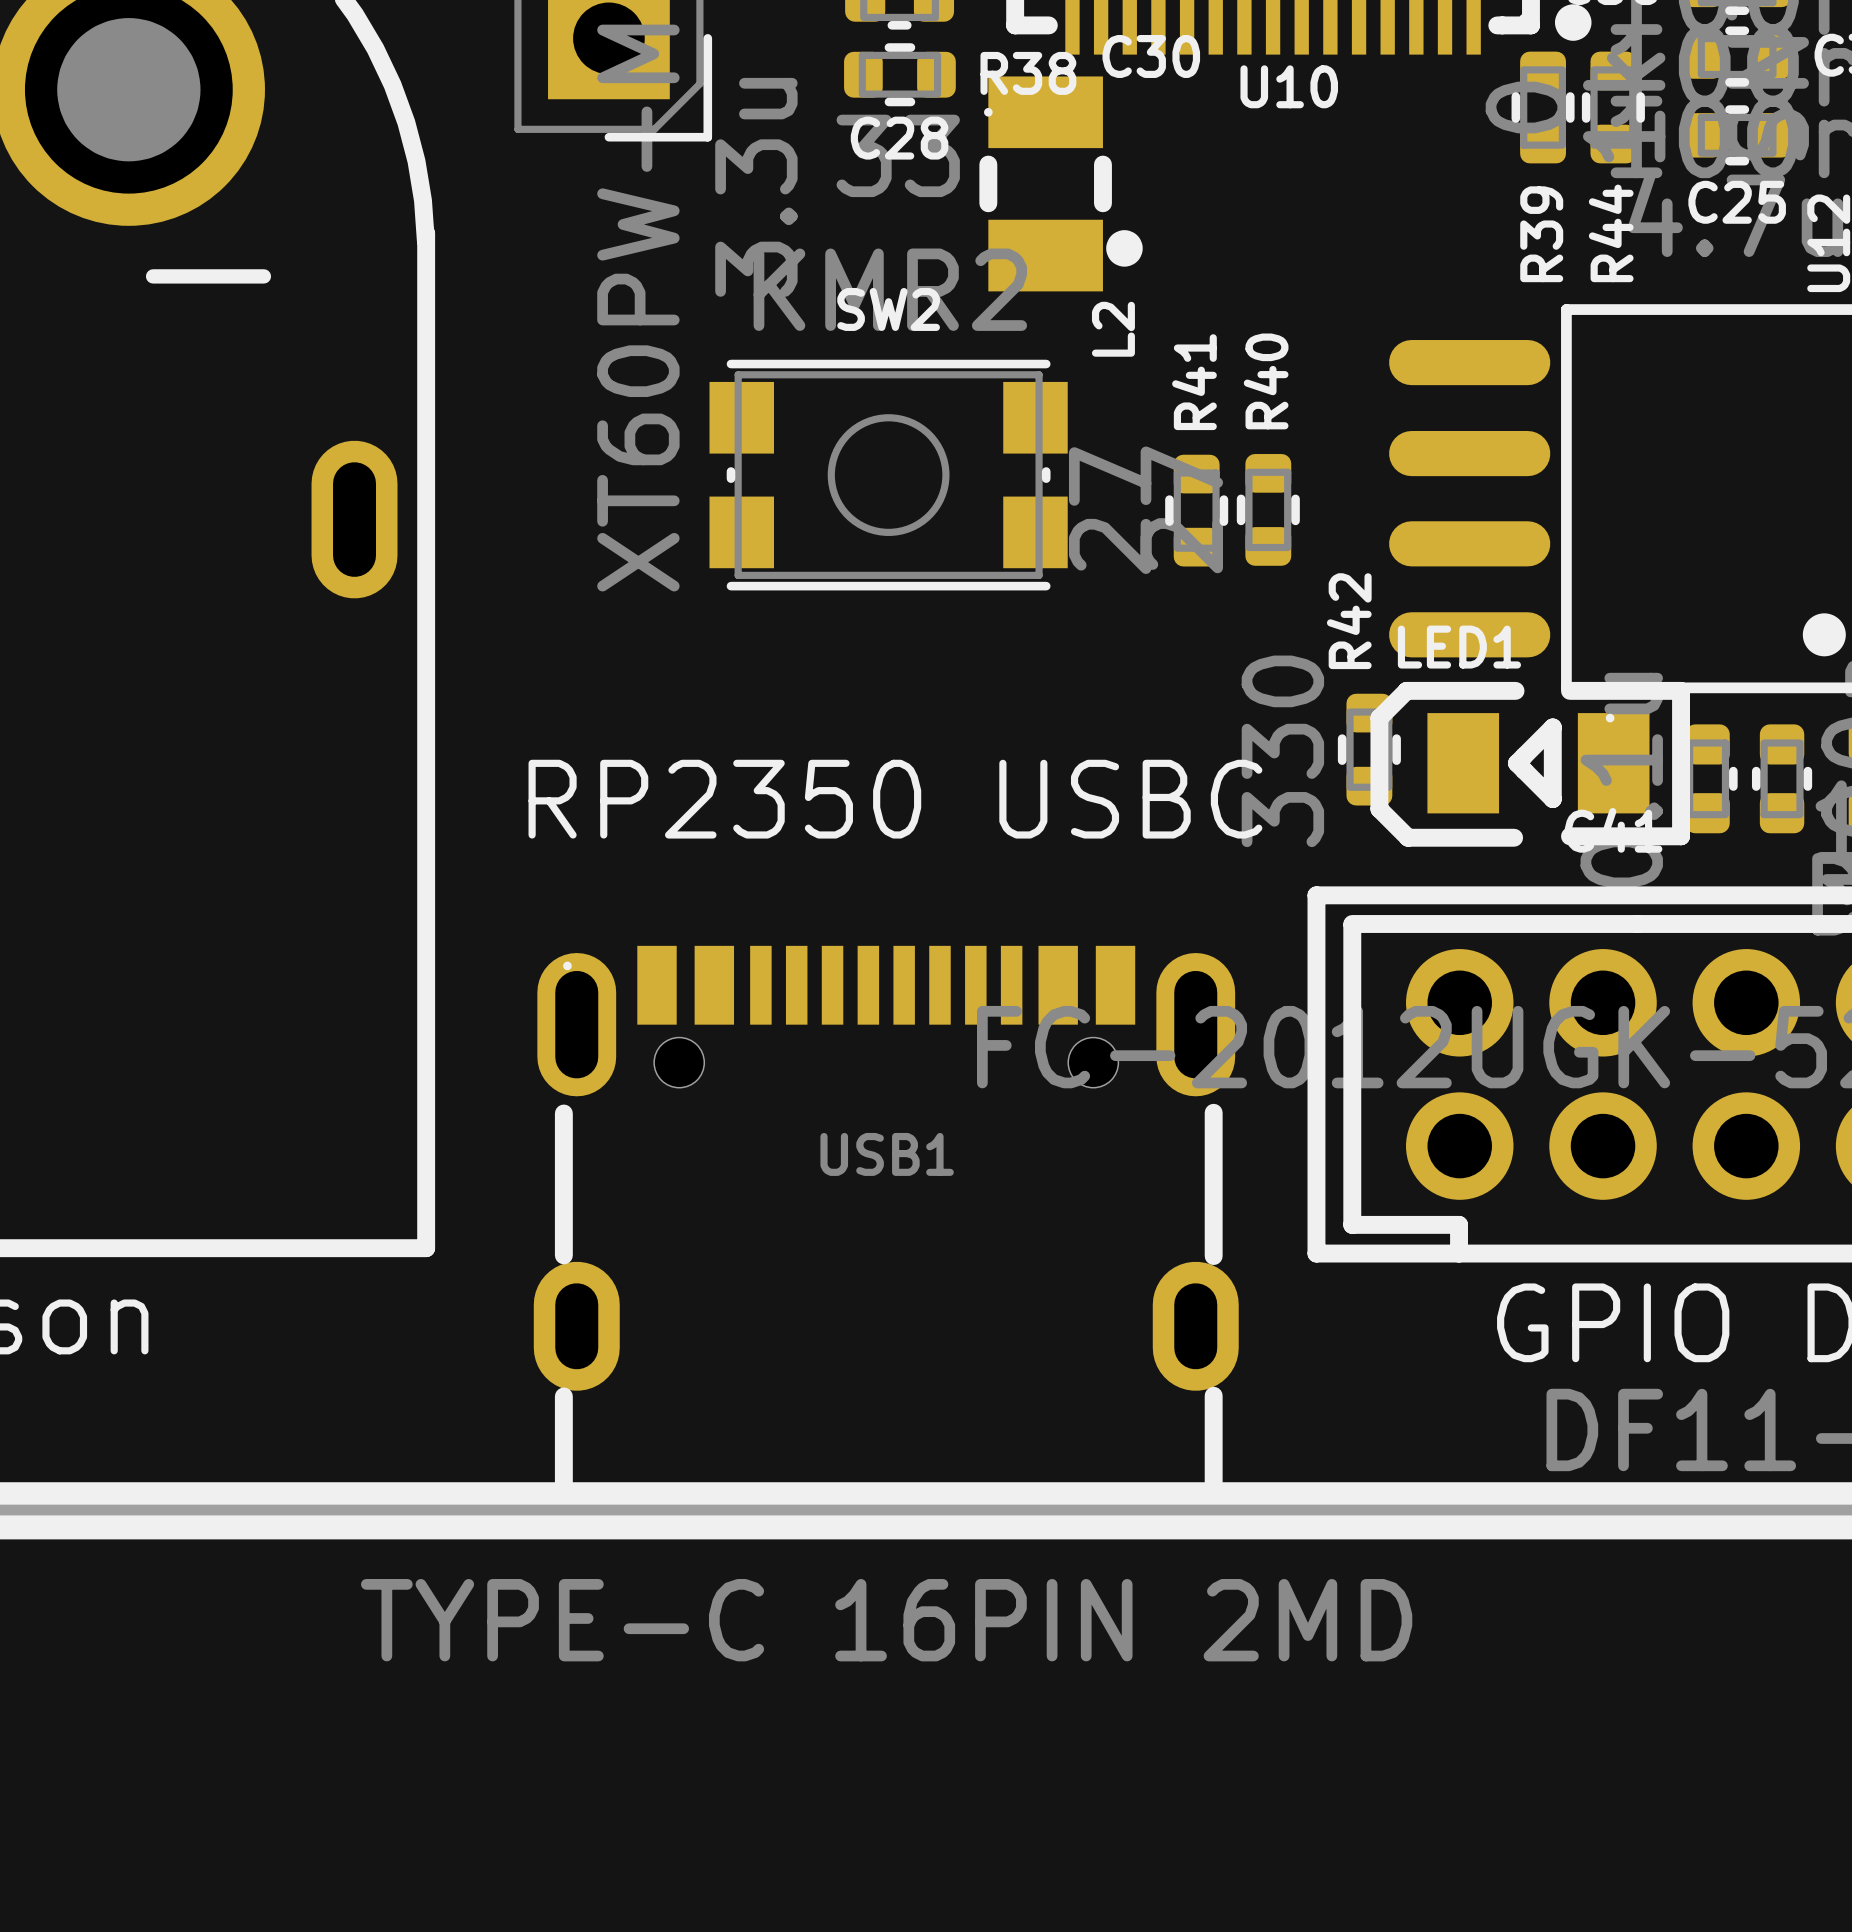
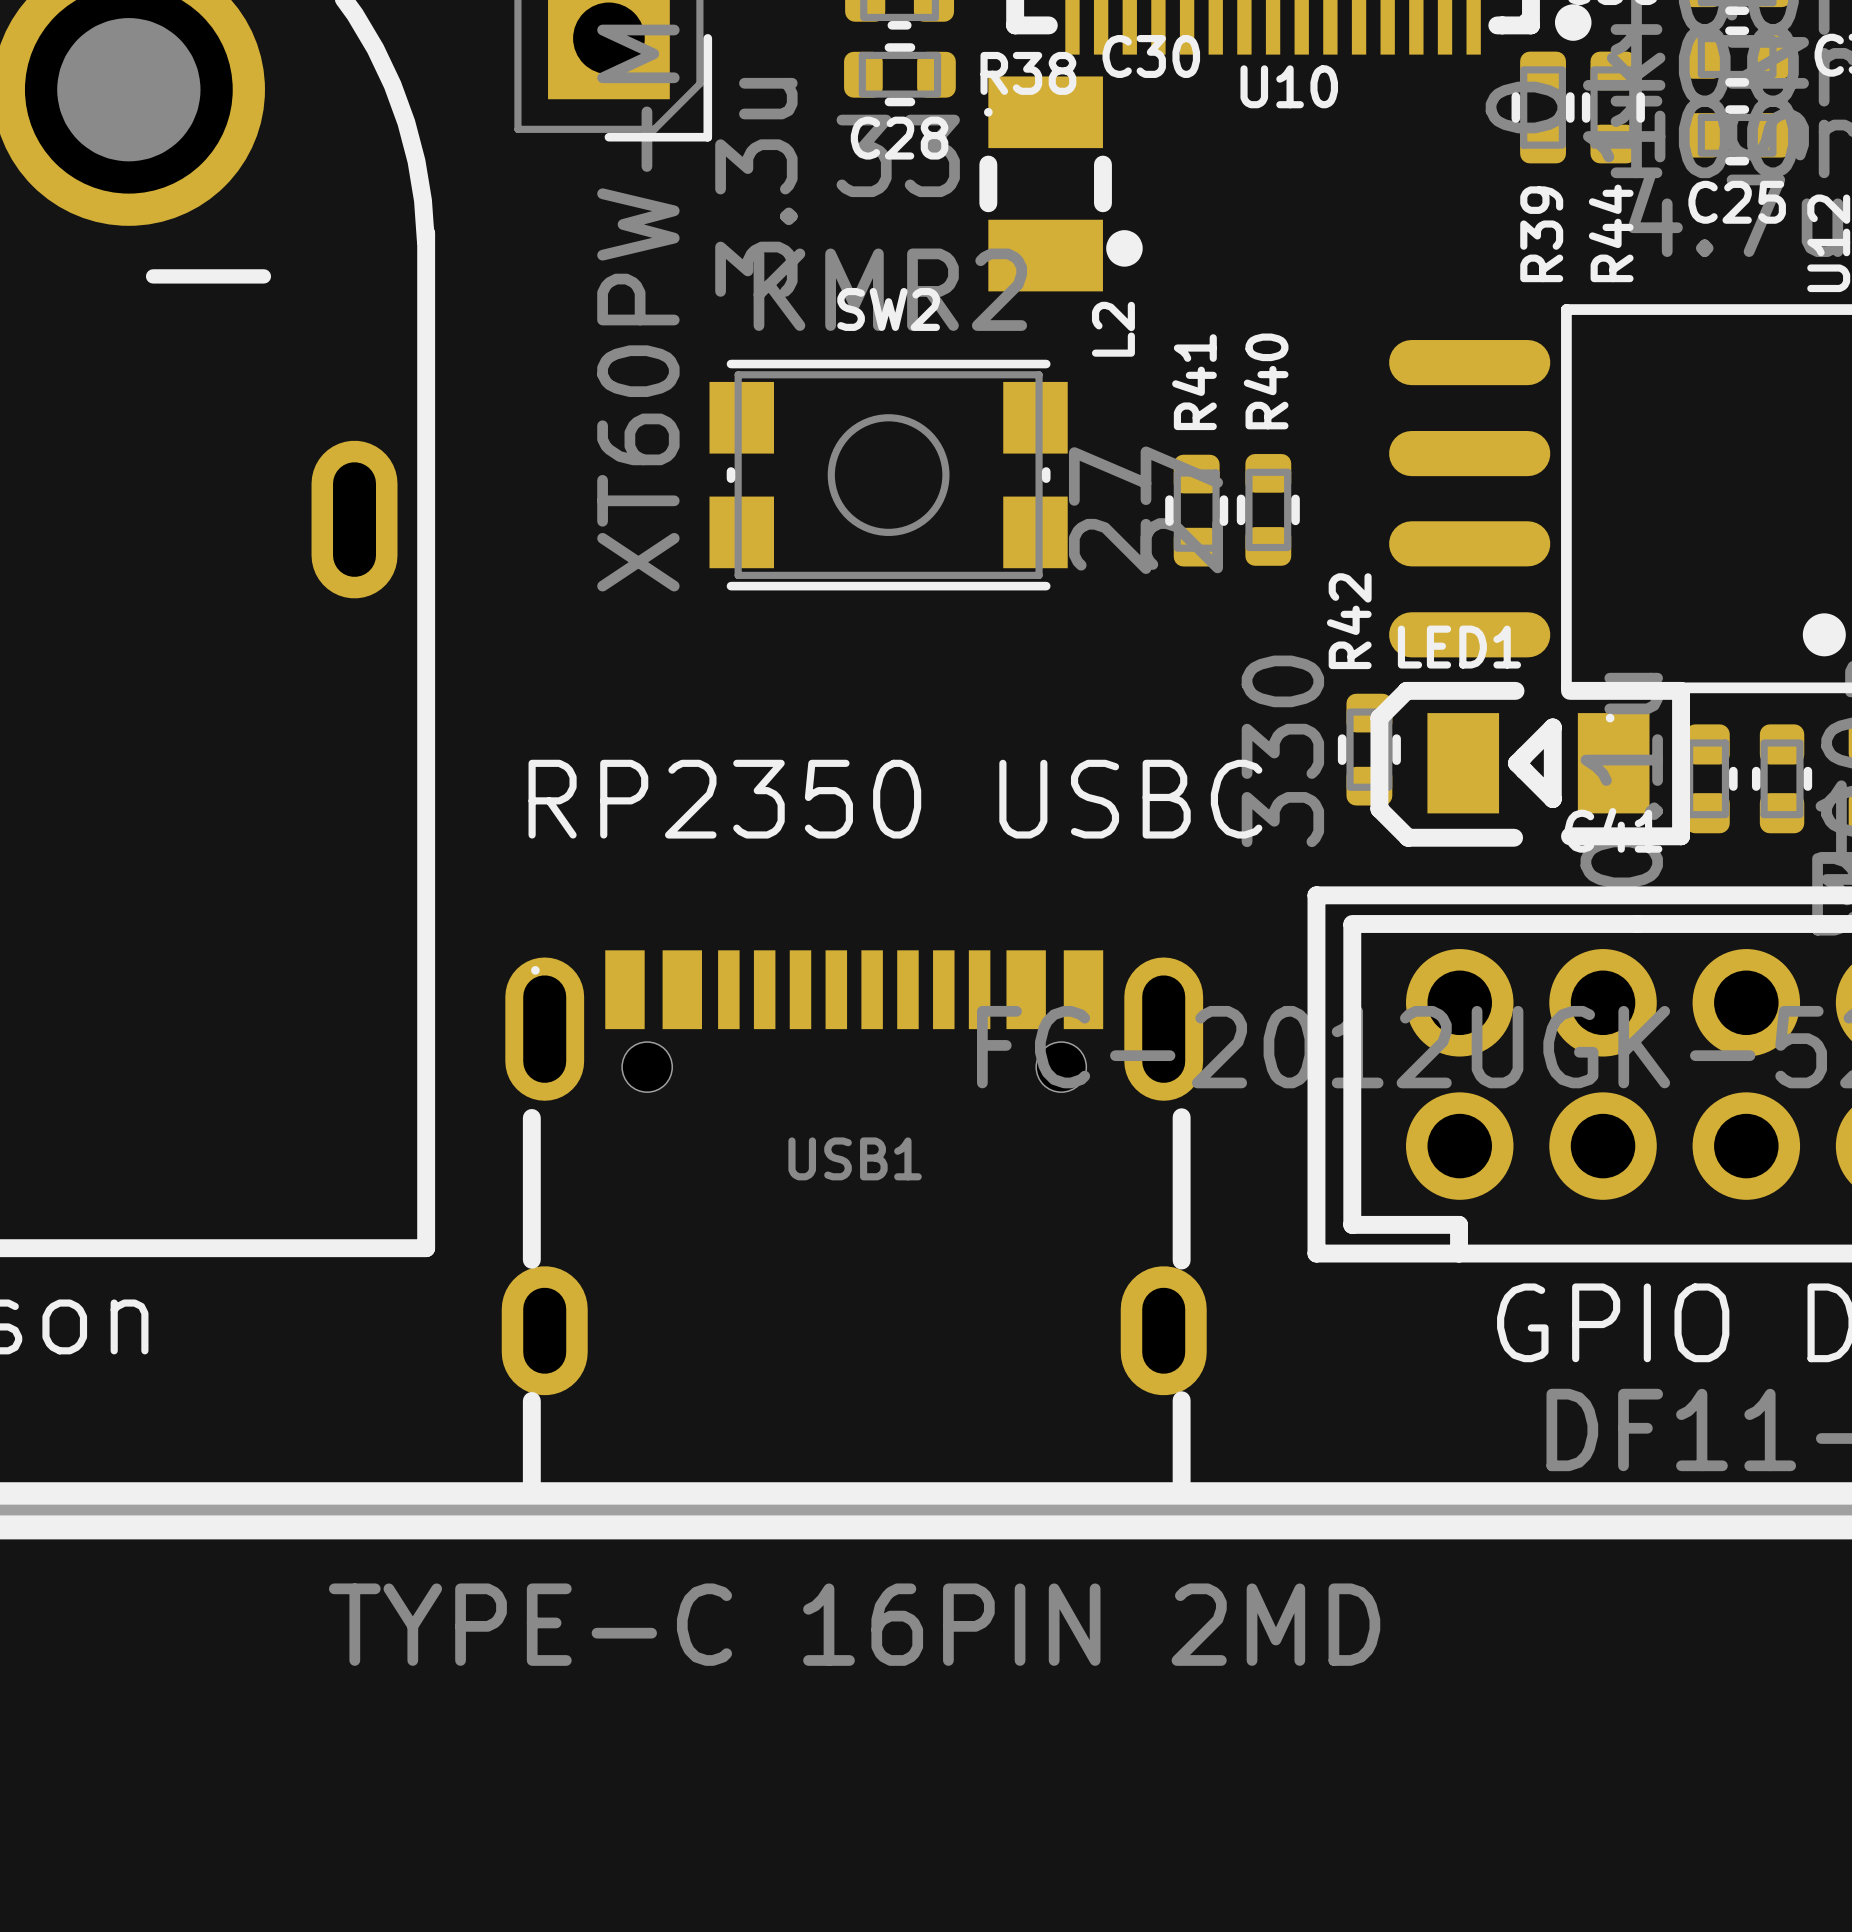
USB1 position: (886, 1233) -> (854, 1237)

